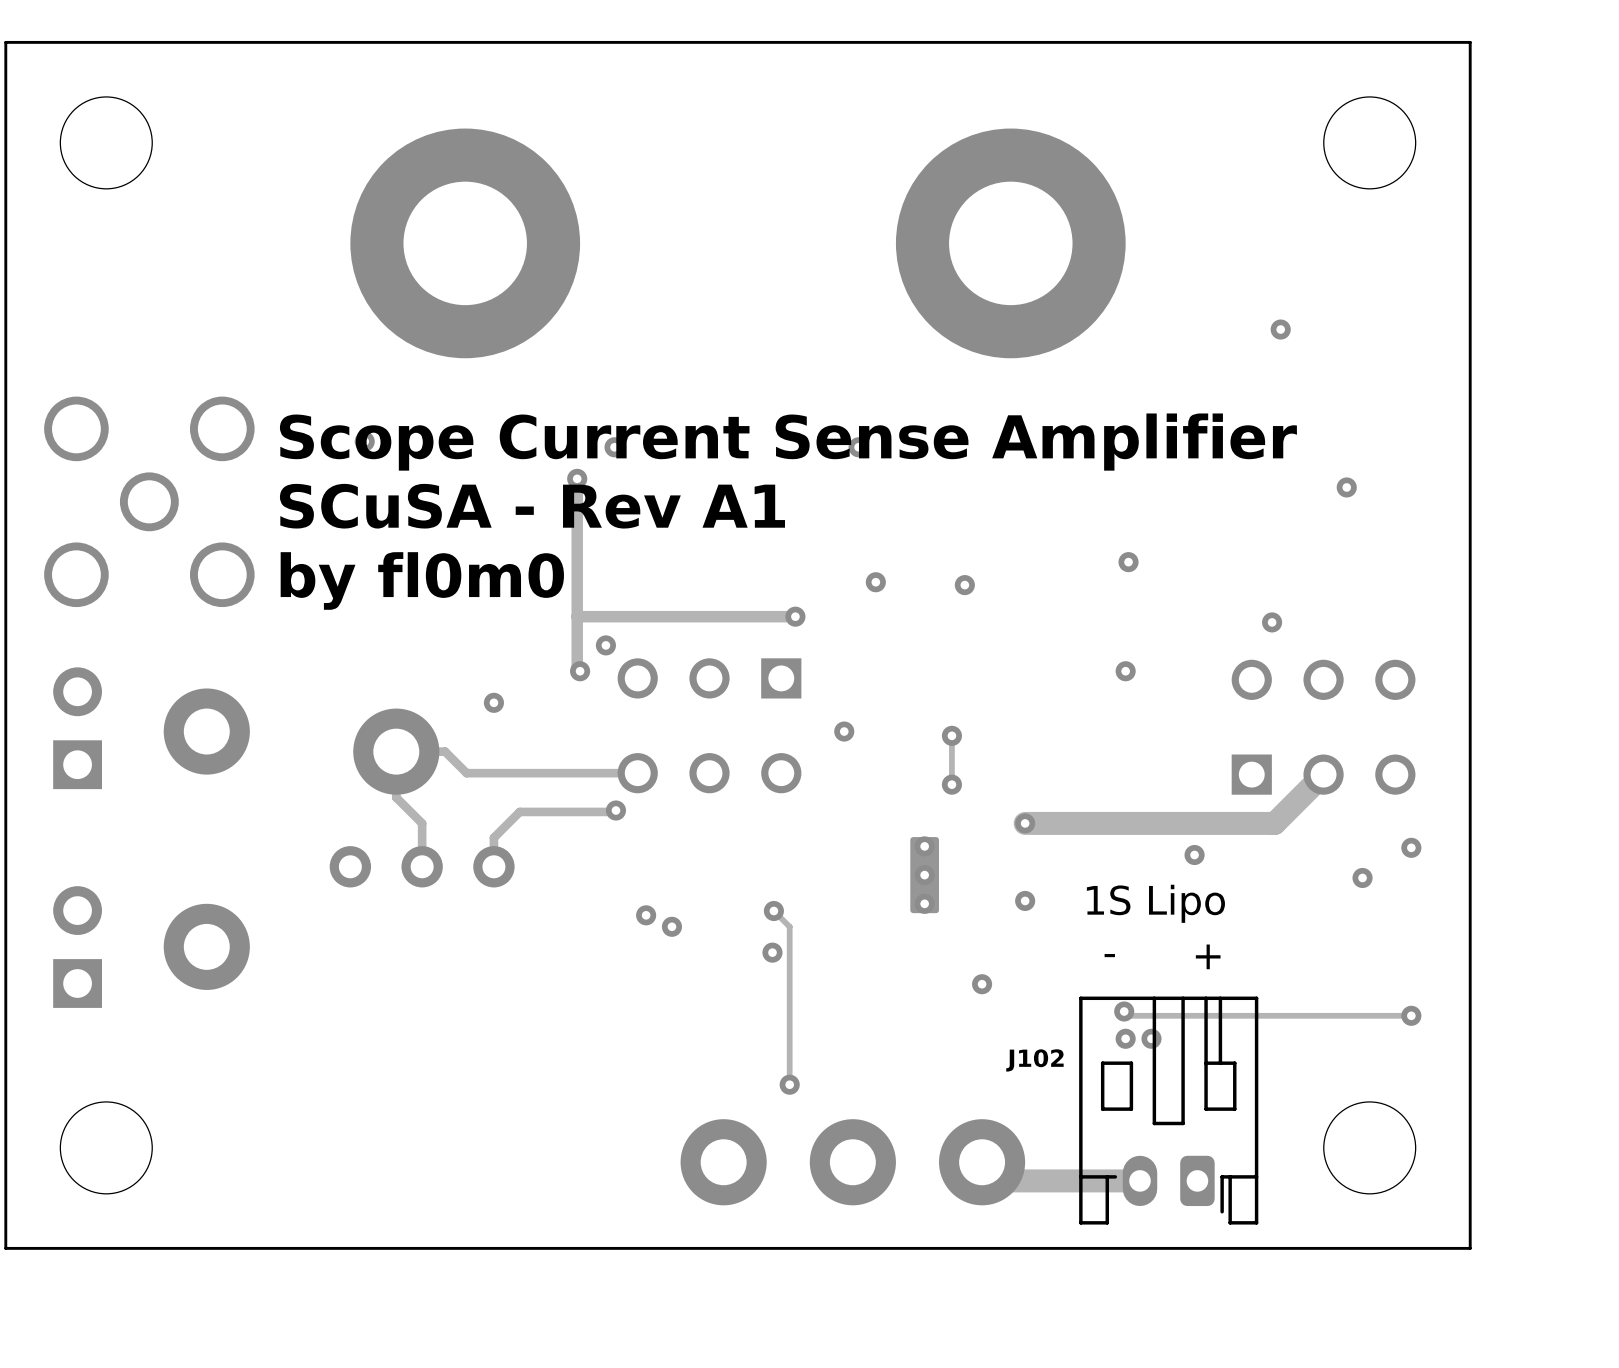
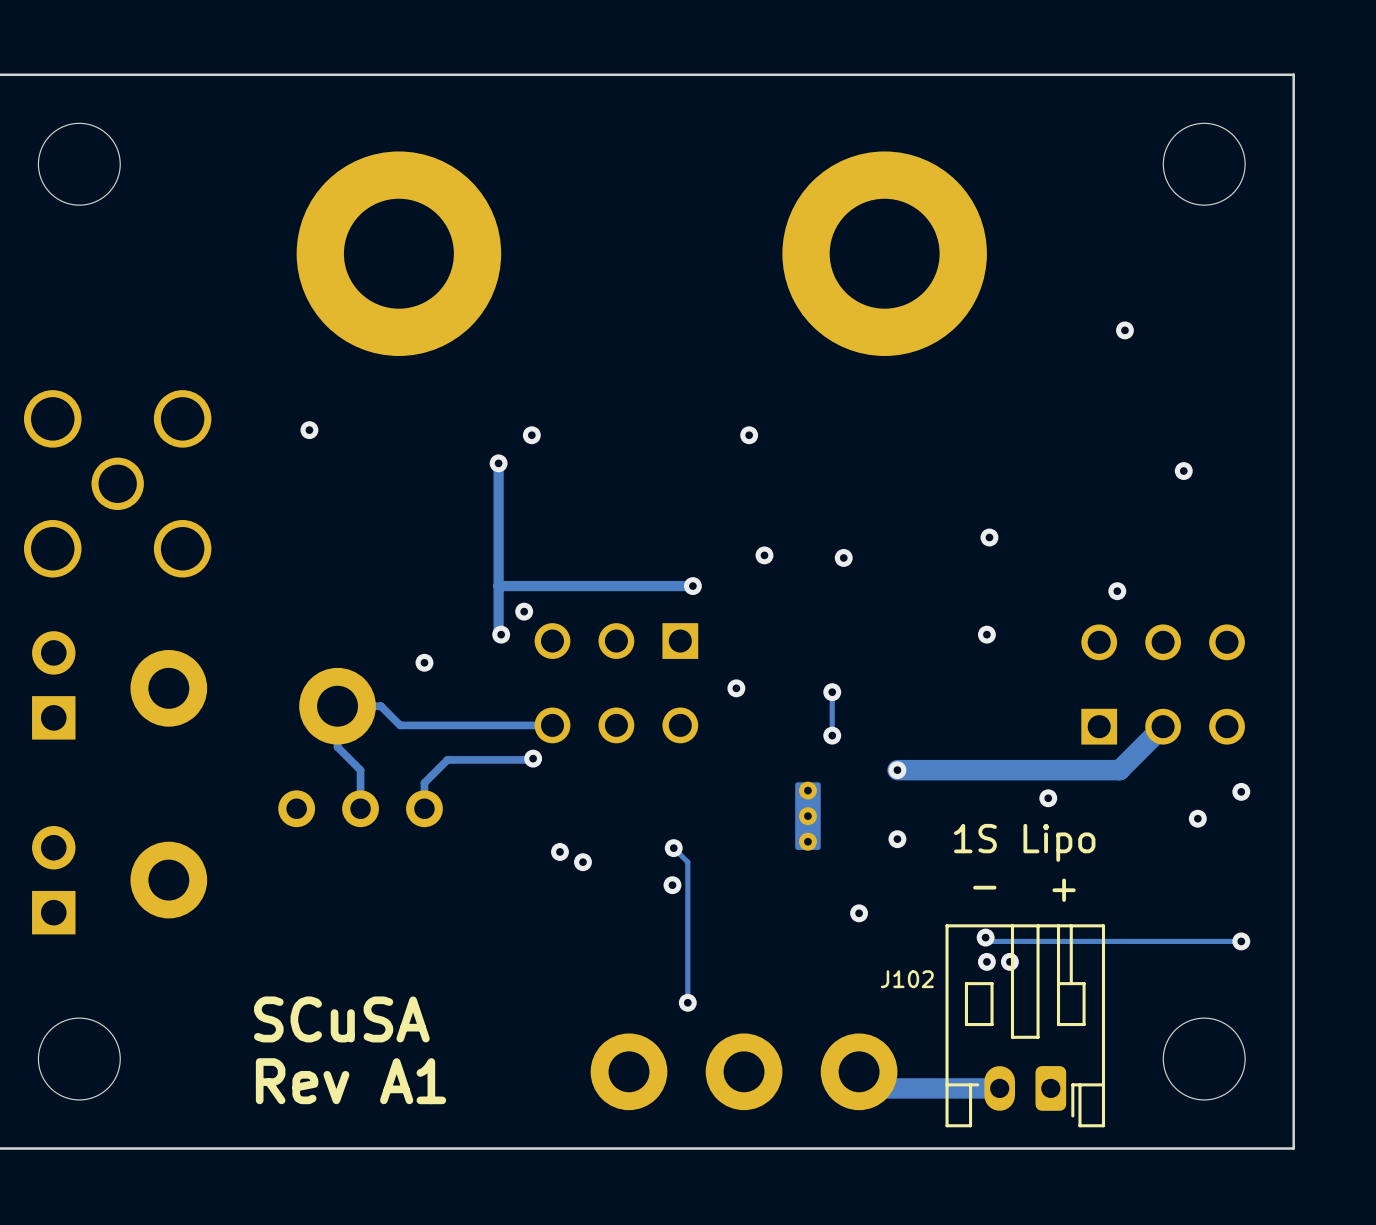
text: Scope Current Sense Amplifier (788, 442) -> none
text: SCuSA - Rev A1 (532, 506) -> none
text: by fl0m0 (422, 580) -> none
text: none -> SCuSA (341, 1019)
text: none -> Rev A1 (351, 1081)

